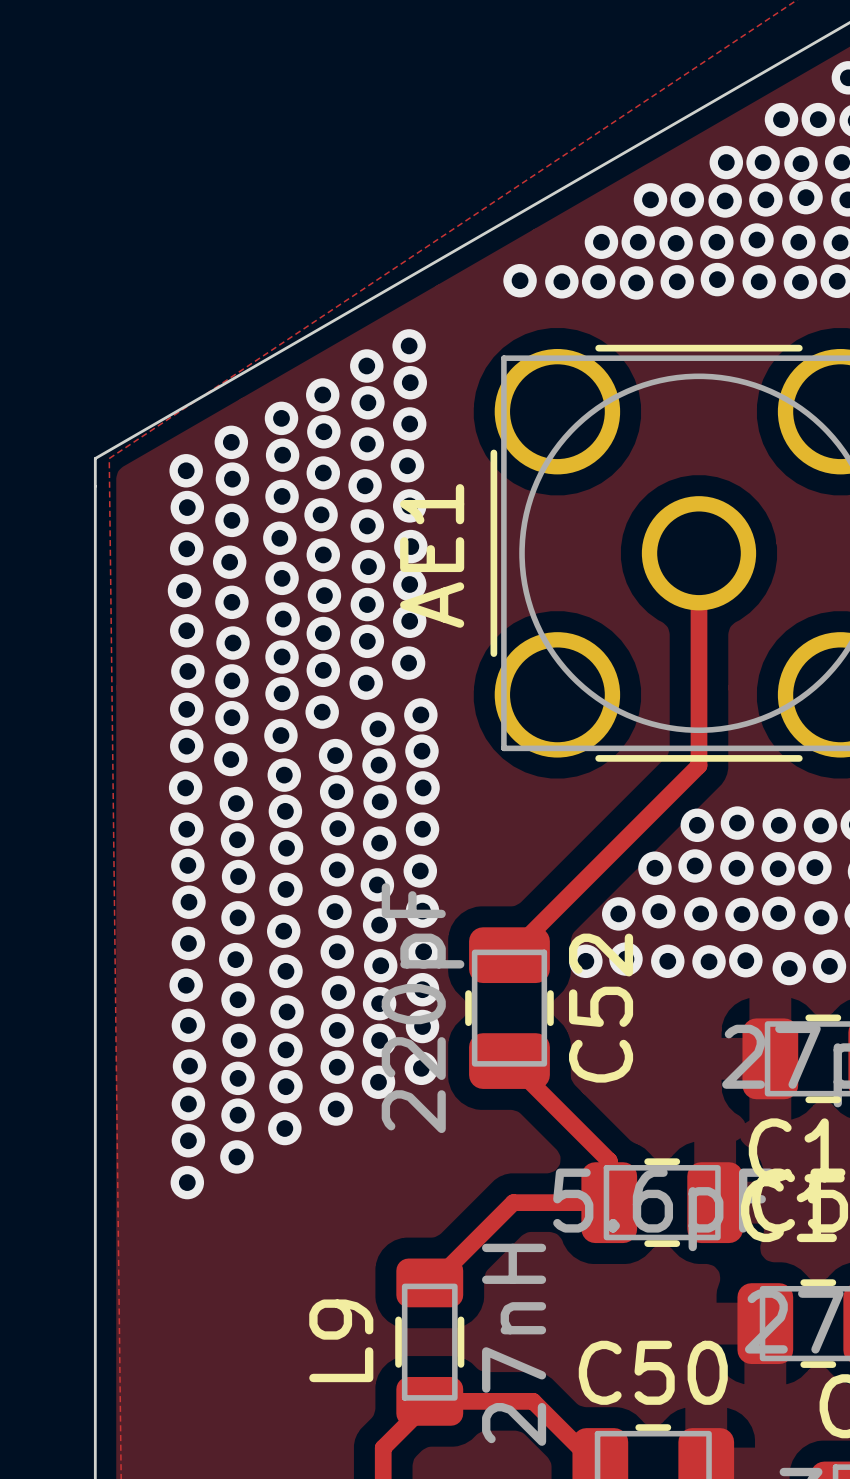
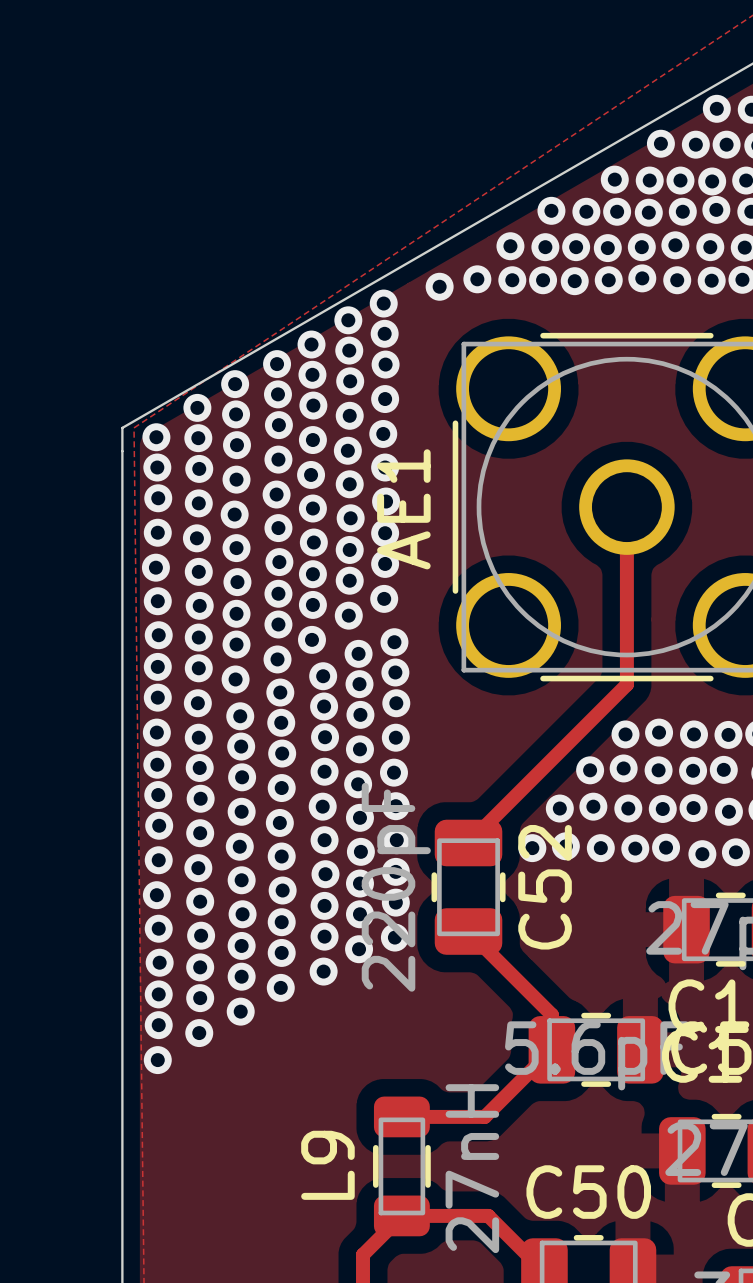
via: none -> (716, 108)
via: none -> (660, 143)
via: none -> (614, 179)
via: none -> (551, 210)
via: none -> (510, 246)
via: none -> (439, 286)
via: none -> (383, 303)
via: none -> (348, 320)
via: none -> (311, 344)
via: none -> (277, 364)
via: none -> (235, 384)
via: none -> (197, 407)
via: none -> (156, 437)
via: none -> (157, 467)
via: none -> (158, 498)
via: none -> (157, 532)
via: none -> (155, 567)
via: none -> (157, 601)
via: none -> (158, 635)
via: none -> (157, 666)
via: none -> (157, 697)
via: none -> (156, 732)
via: none -> (157, 764)
via: none -> (158, 795)
via: none -> (159, 825)
via: none -> (158, 860)
via: none -> (156, 895)
via: none -> (158, 928)
via: none -> (159, 962)
via: none -> (158, 994)
via: none -> (158, 1025)
track: (609, 1202) (513, 1202) (433, 1282) -> (551, 1049) (484, 1116) (404, 1116)
via: none -> (157, 1060)

